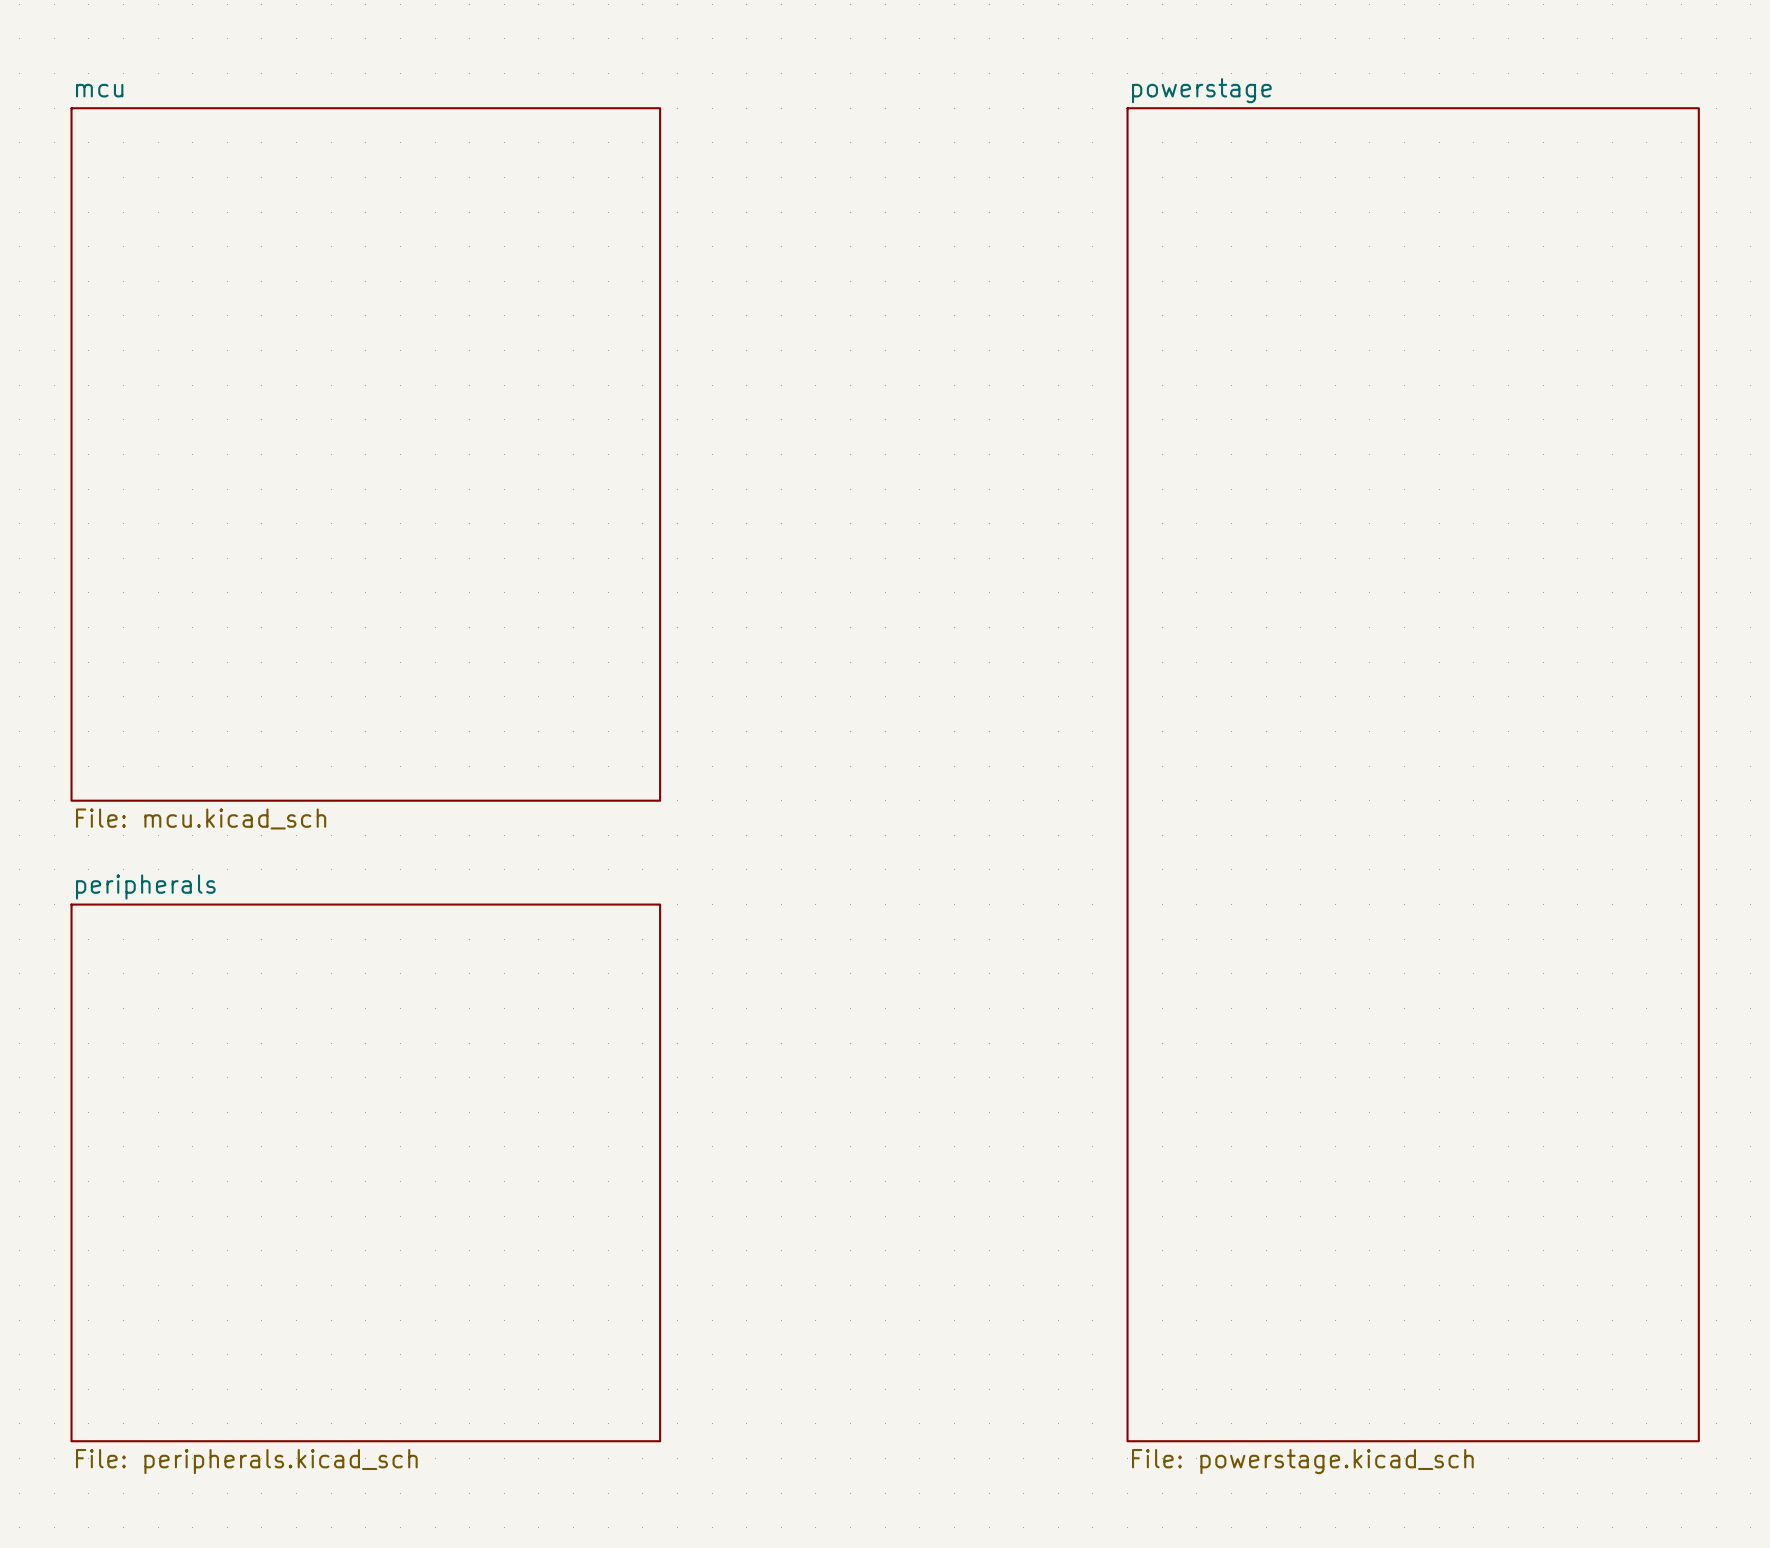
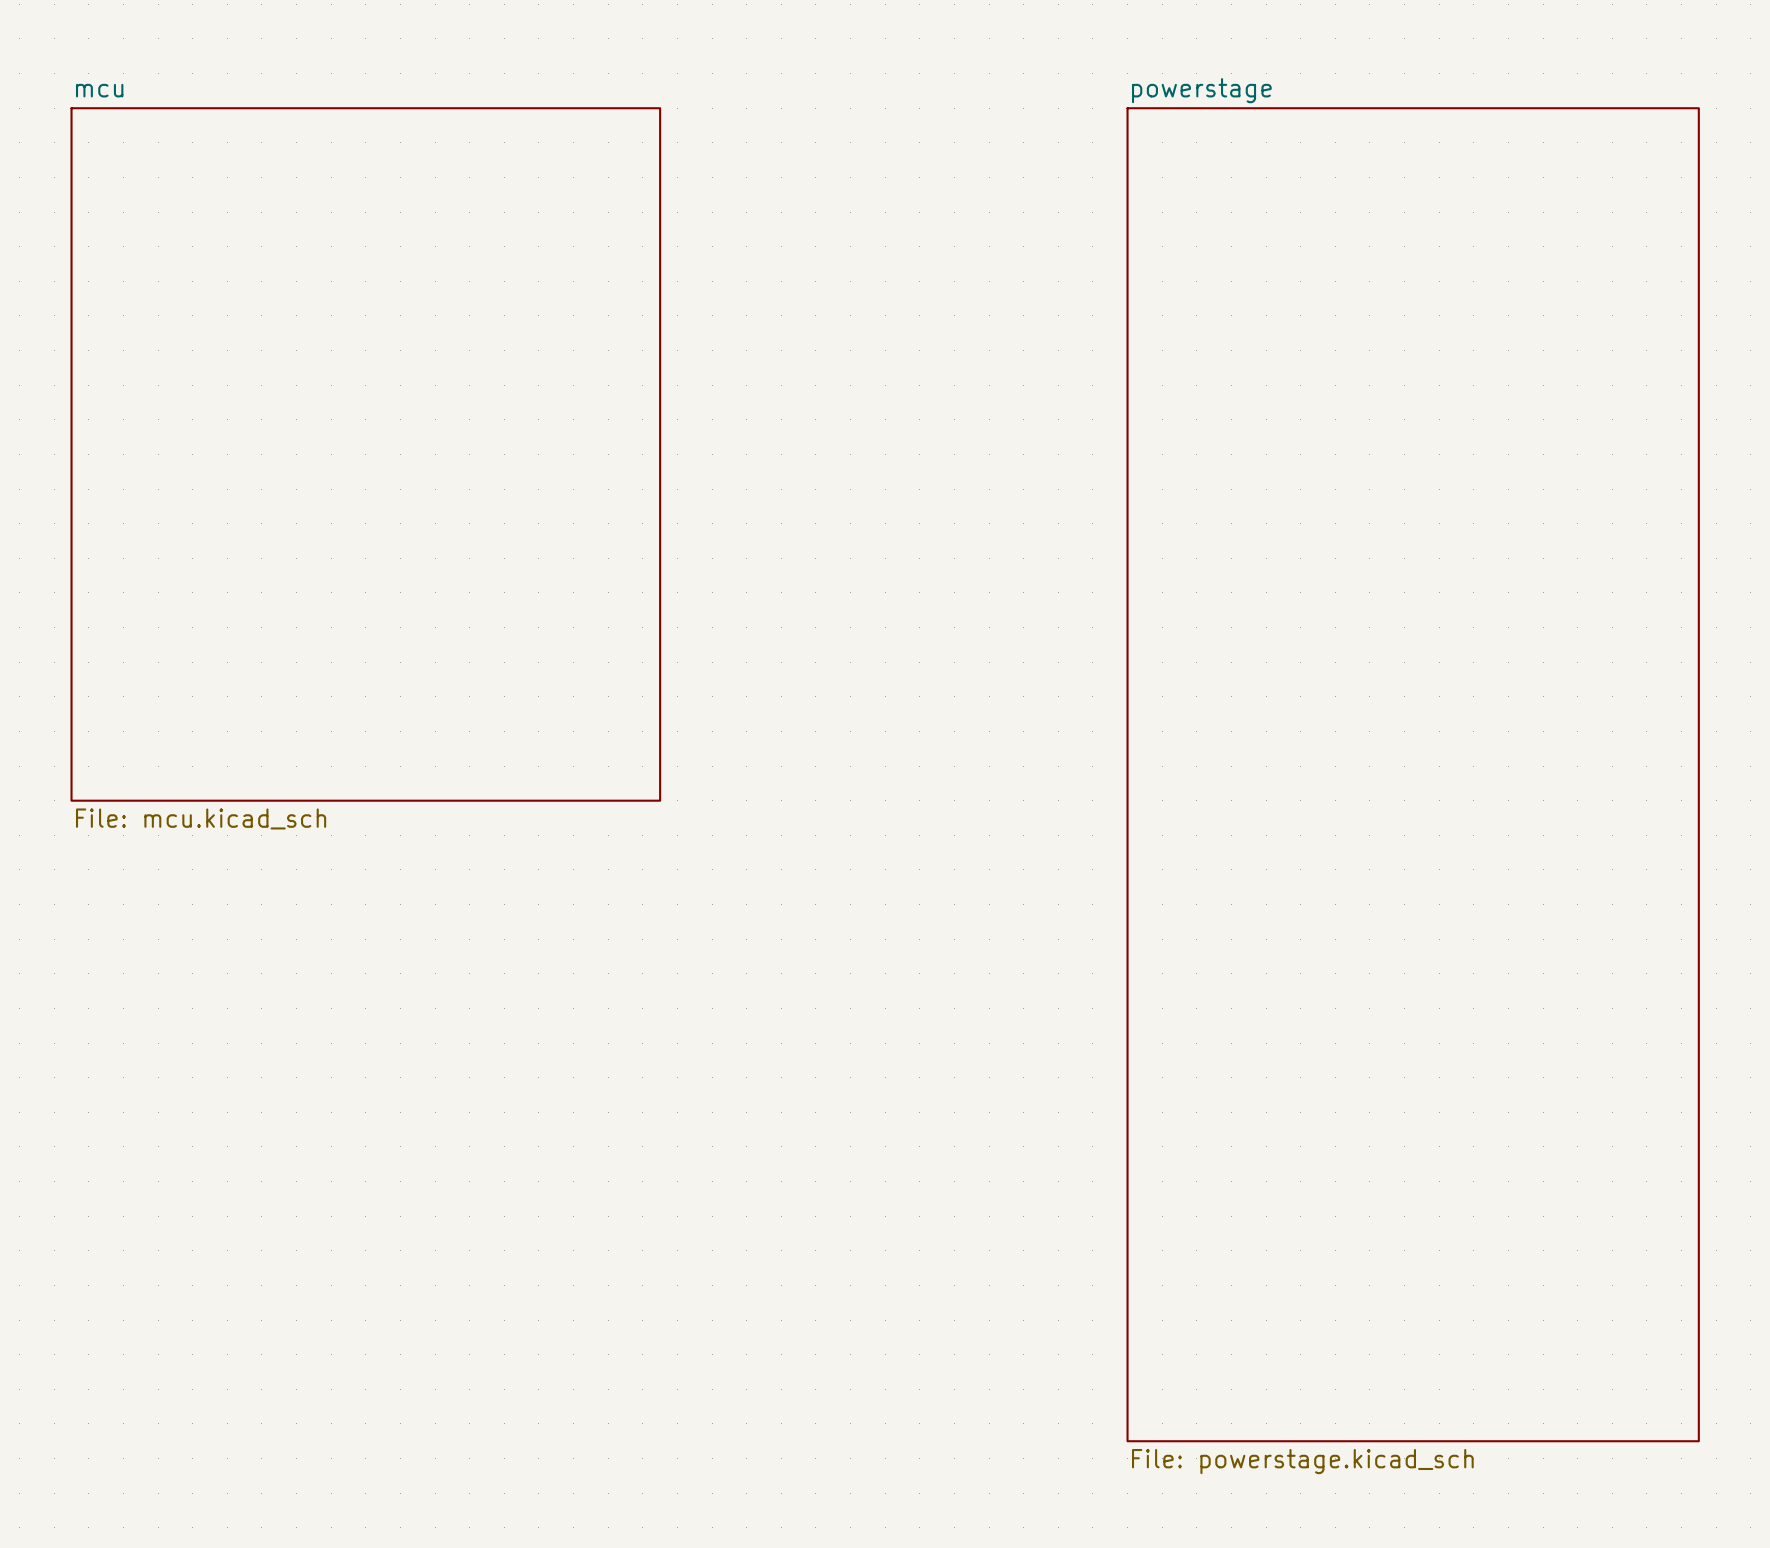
sheet peripherals: File: peripherals.kicad_sch (365, 1172) -> none

